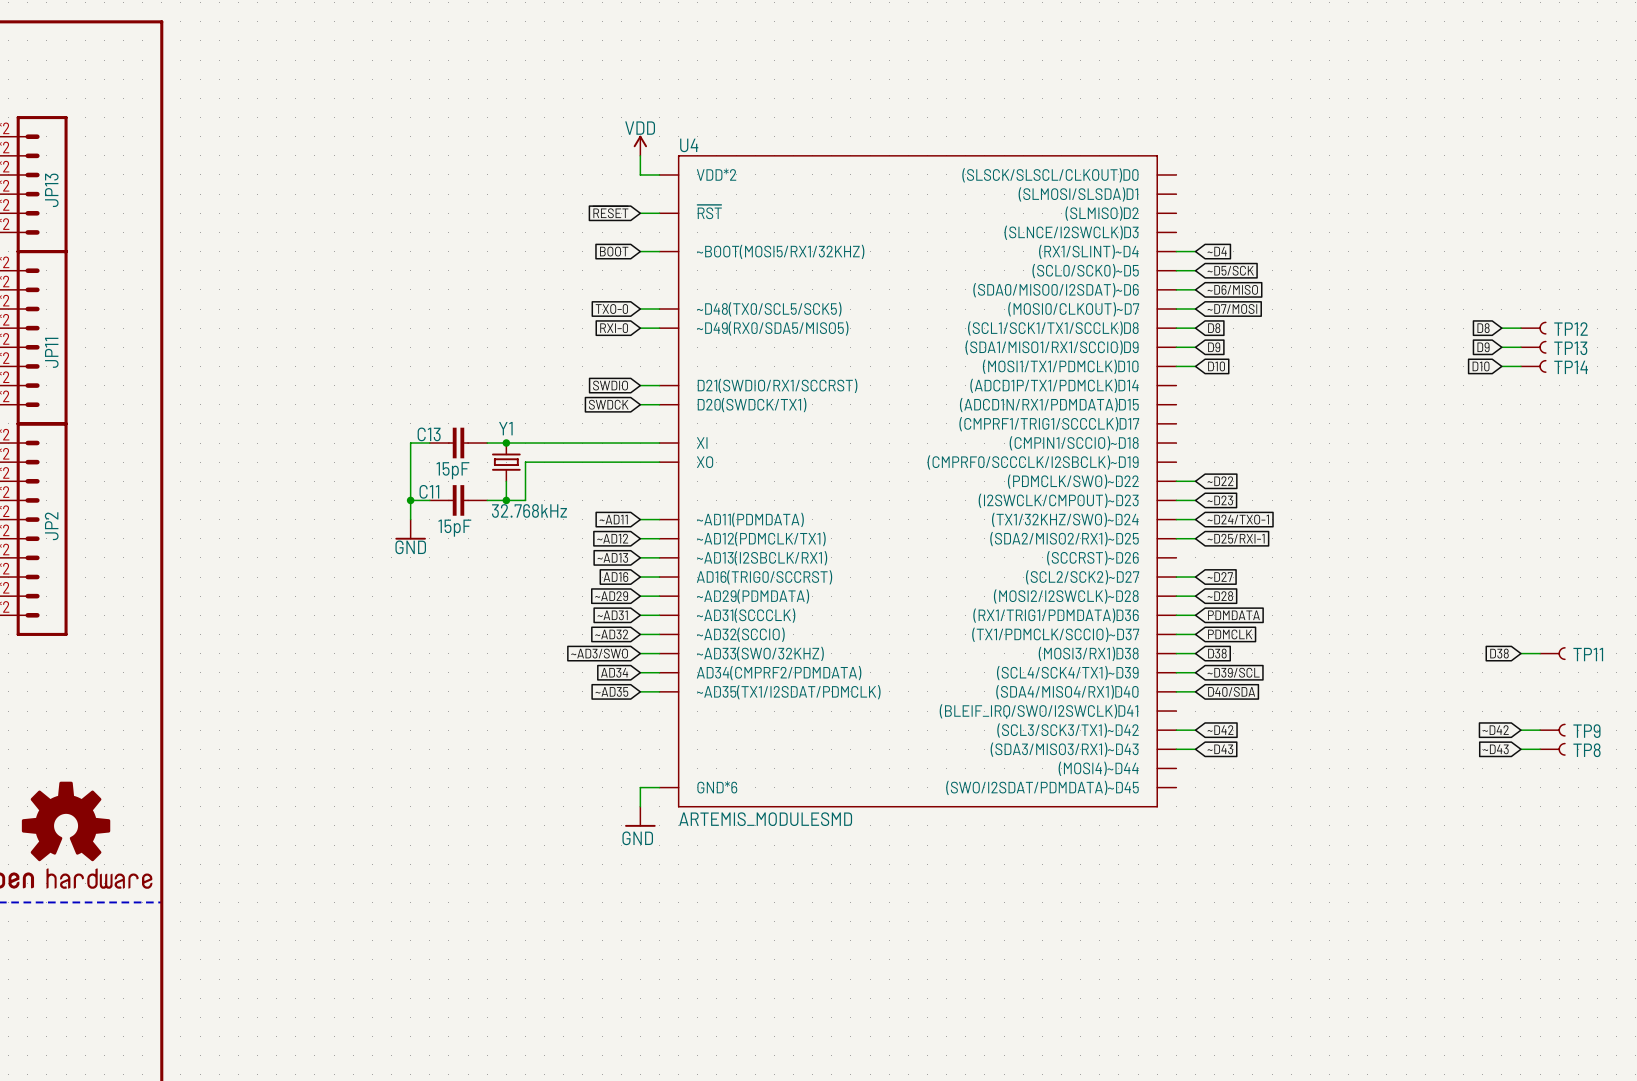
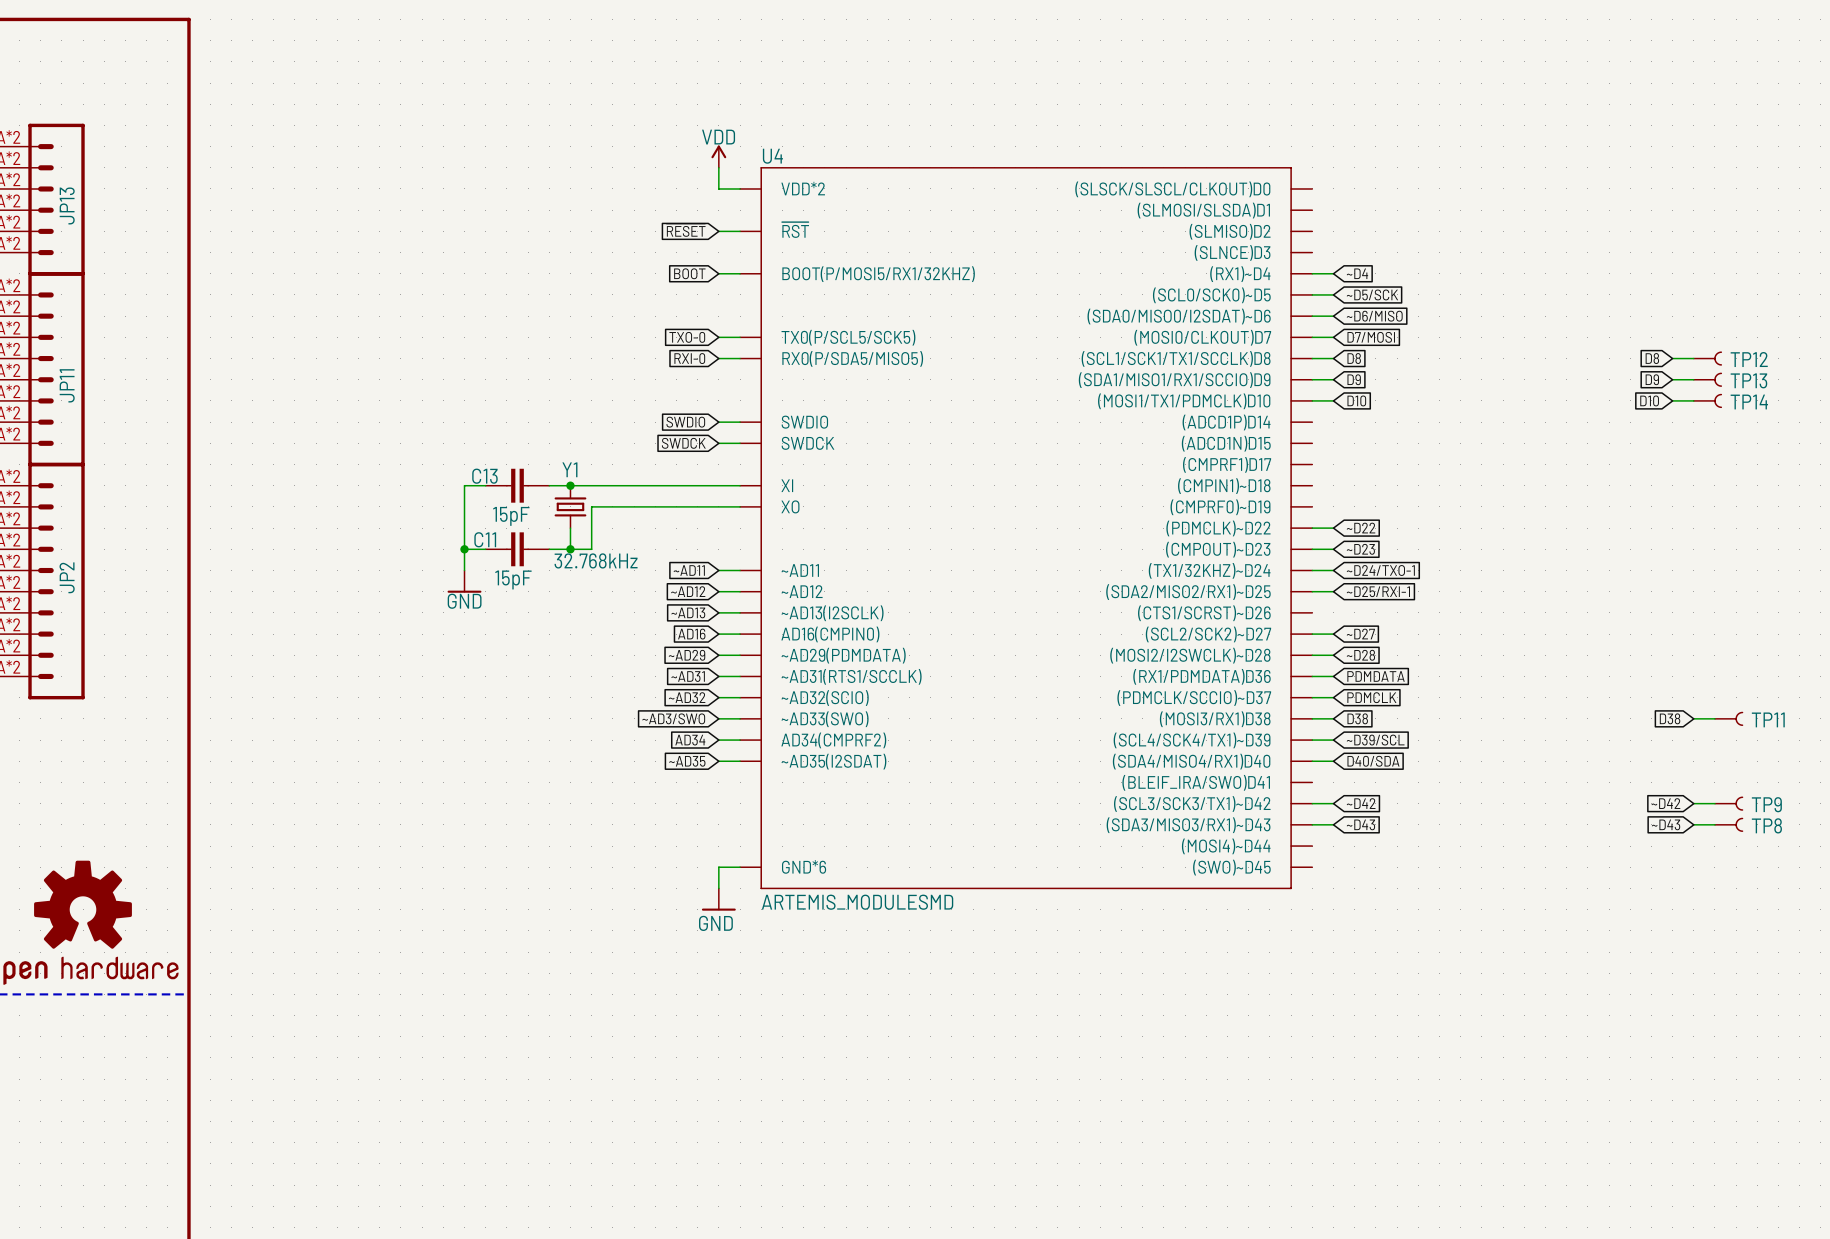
U4 symbol: [659, 155, 1177, 808] -> [740, 167, 1313, 890]
global label: ~D7/MOSI (1232, 309) -> D7/MOSI (1371, 337)

